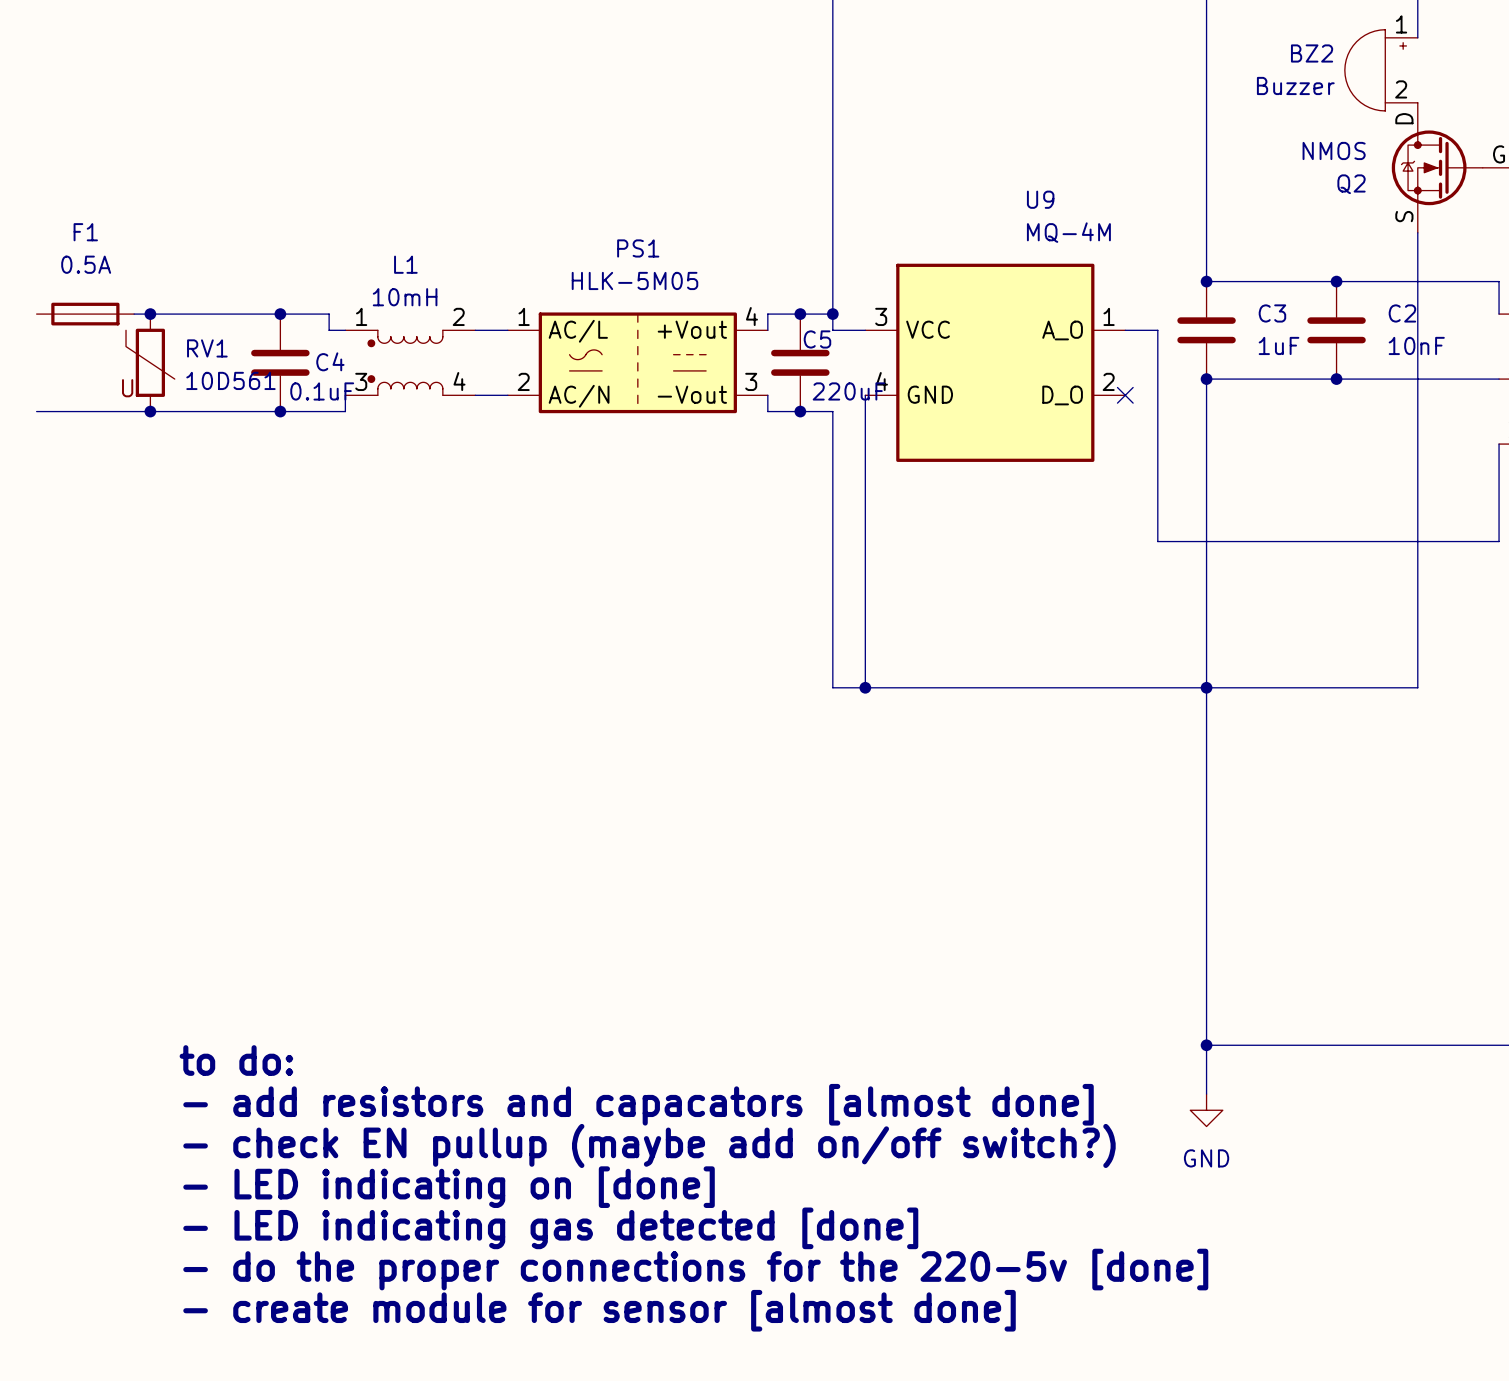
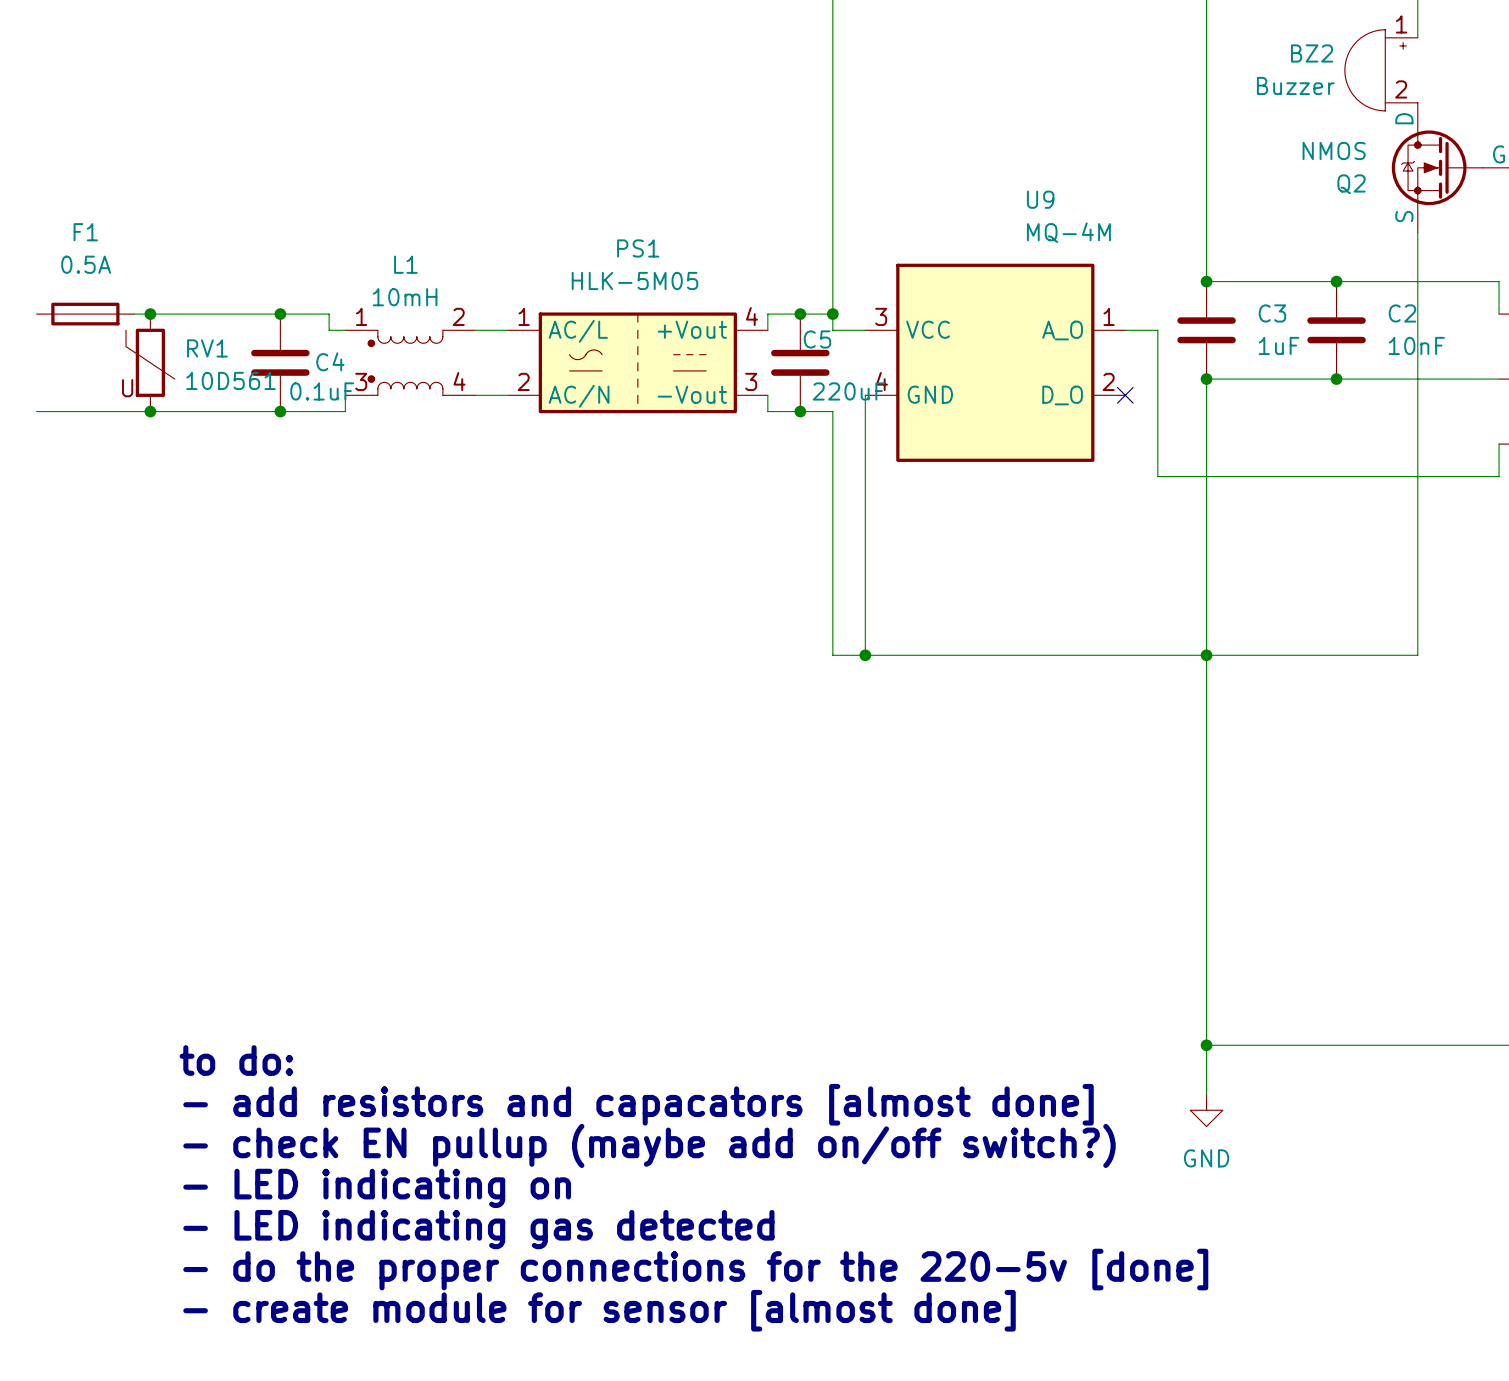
wire: (1157, 476) (1157, 541) (1499, 541) (1499, 476) -> (1157, 476) (1499, 476)
wire: (832, 655) (832, 687) (1417, 687) (1417, 655) -> (832, 655) (1417, 655)
wire: (865, 655) (865, 687) -> none
junction position: (865, 687) -> (865, 655)
junction position: (1206, 687) -> (1206, 655)
text: - LED indicating on [done] (449, 1187) -> - LED indicating on (377, 1188)
text: - LED indicating gas detected [done] (550, 1228) -> - LED indicating gas detected (478, 1229)

